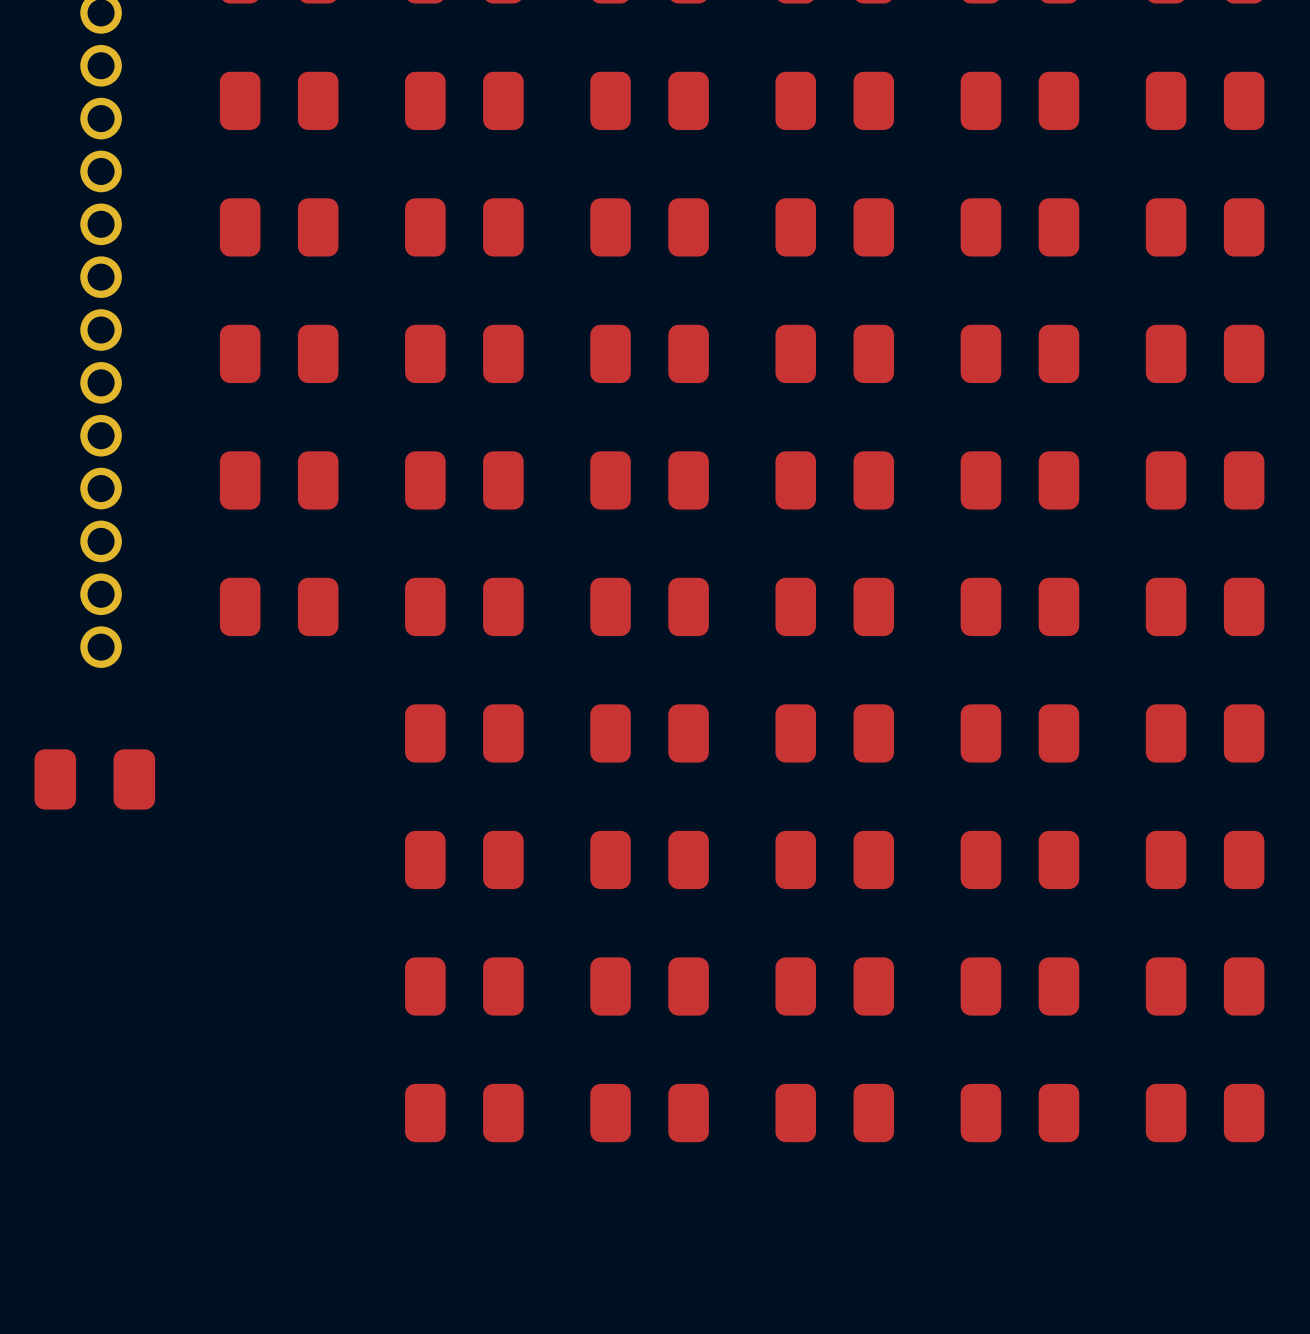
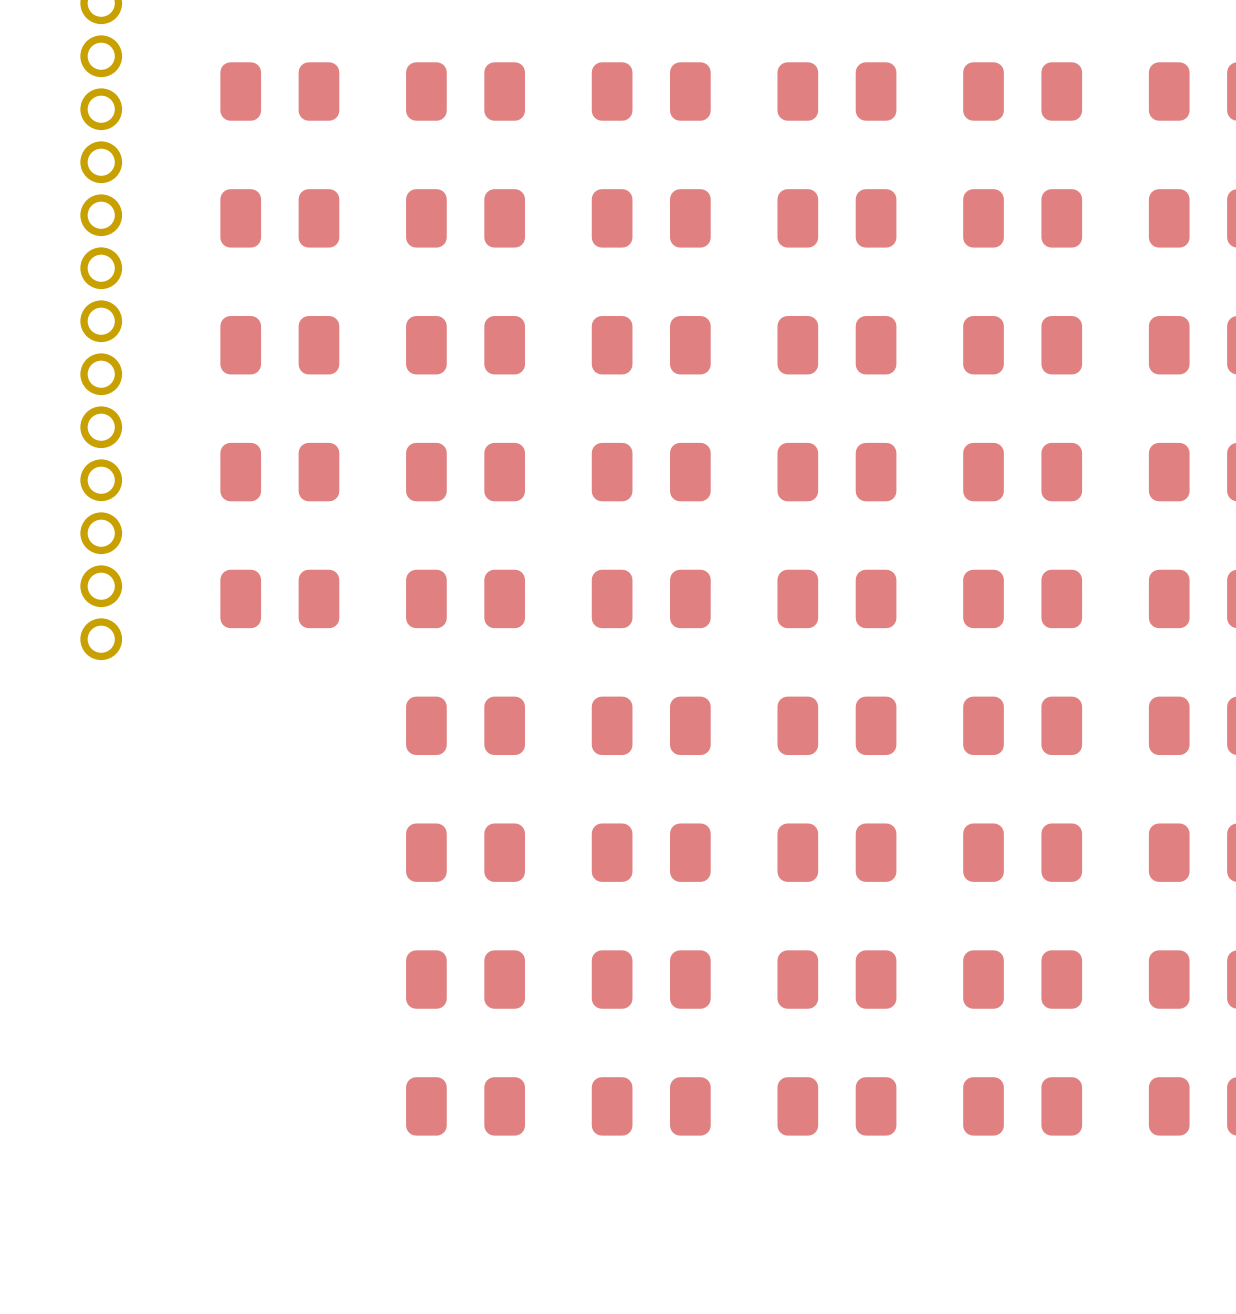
part: (94, 779) -> none

